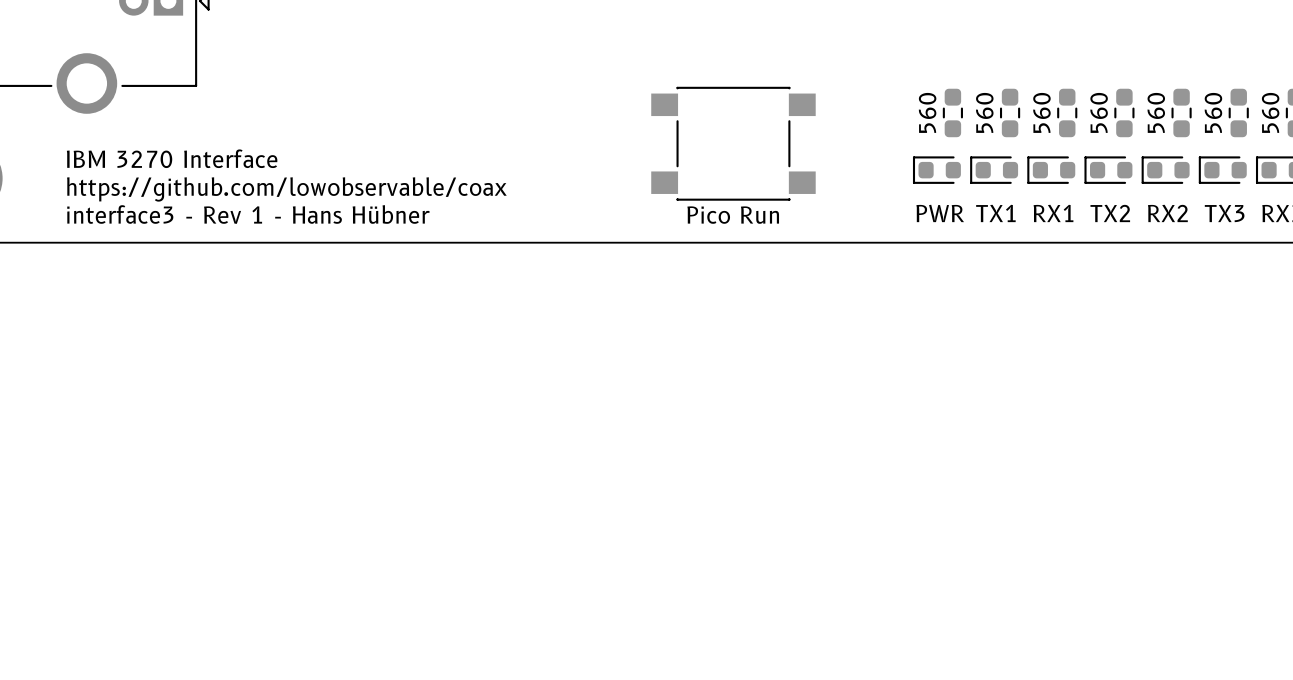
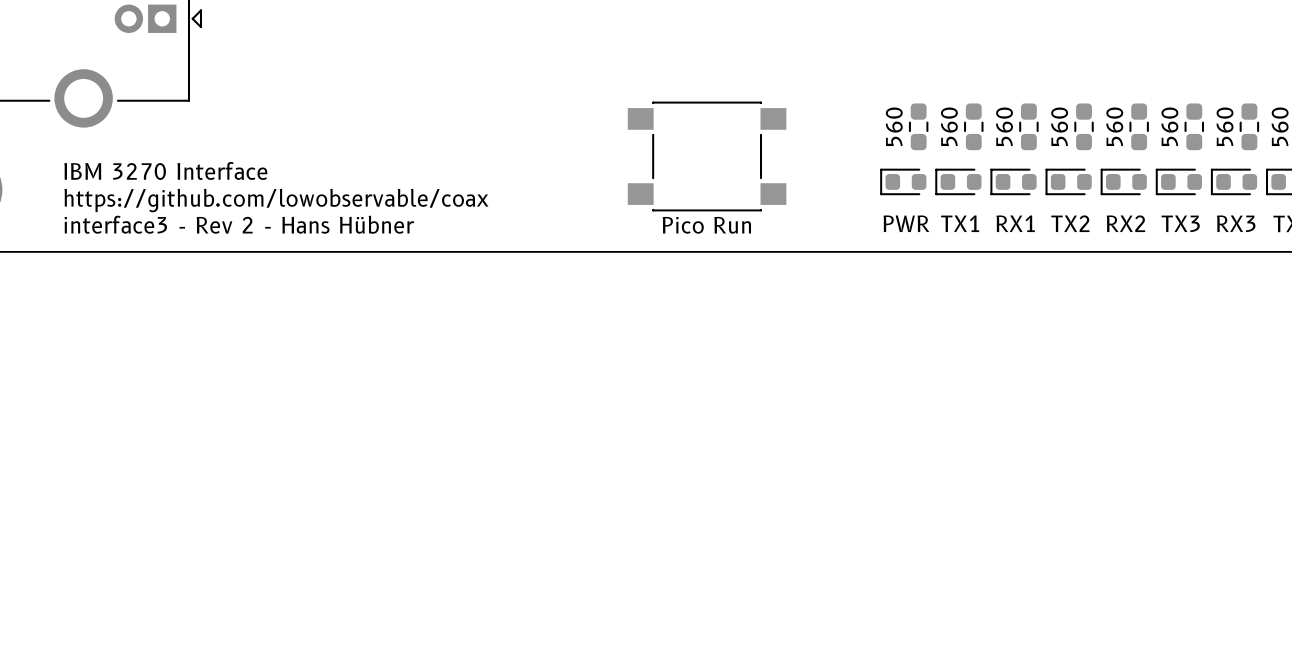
text: interface3 - Rev 1 - Hans Hübner (248, 214) -> interface3 - Rev 2 - Hans Hübner (239, 224)

